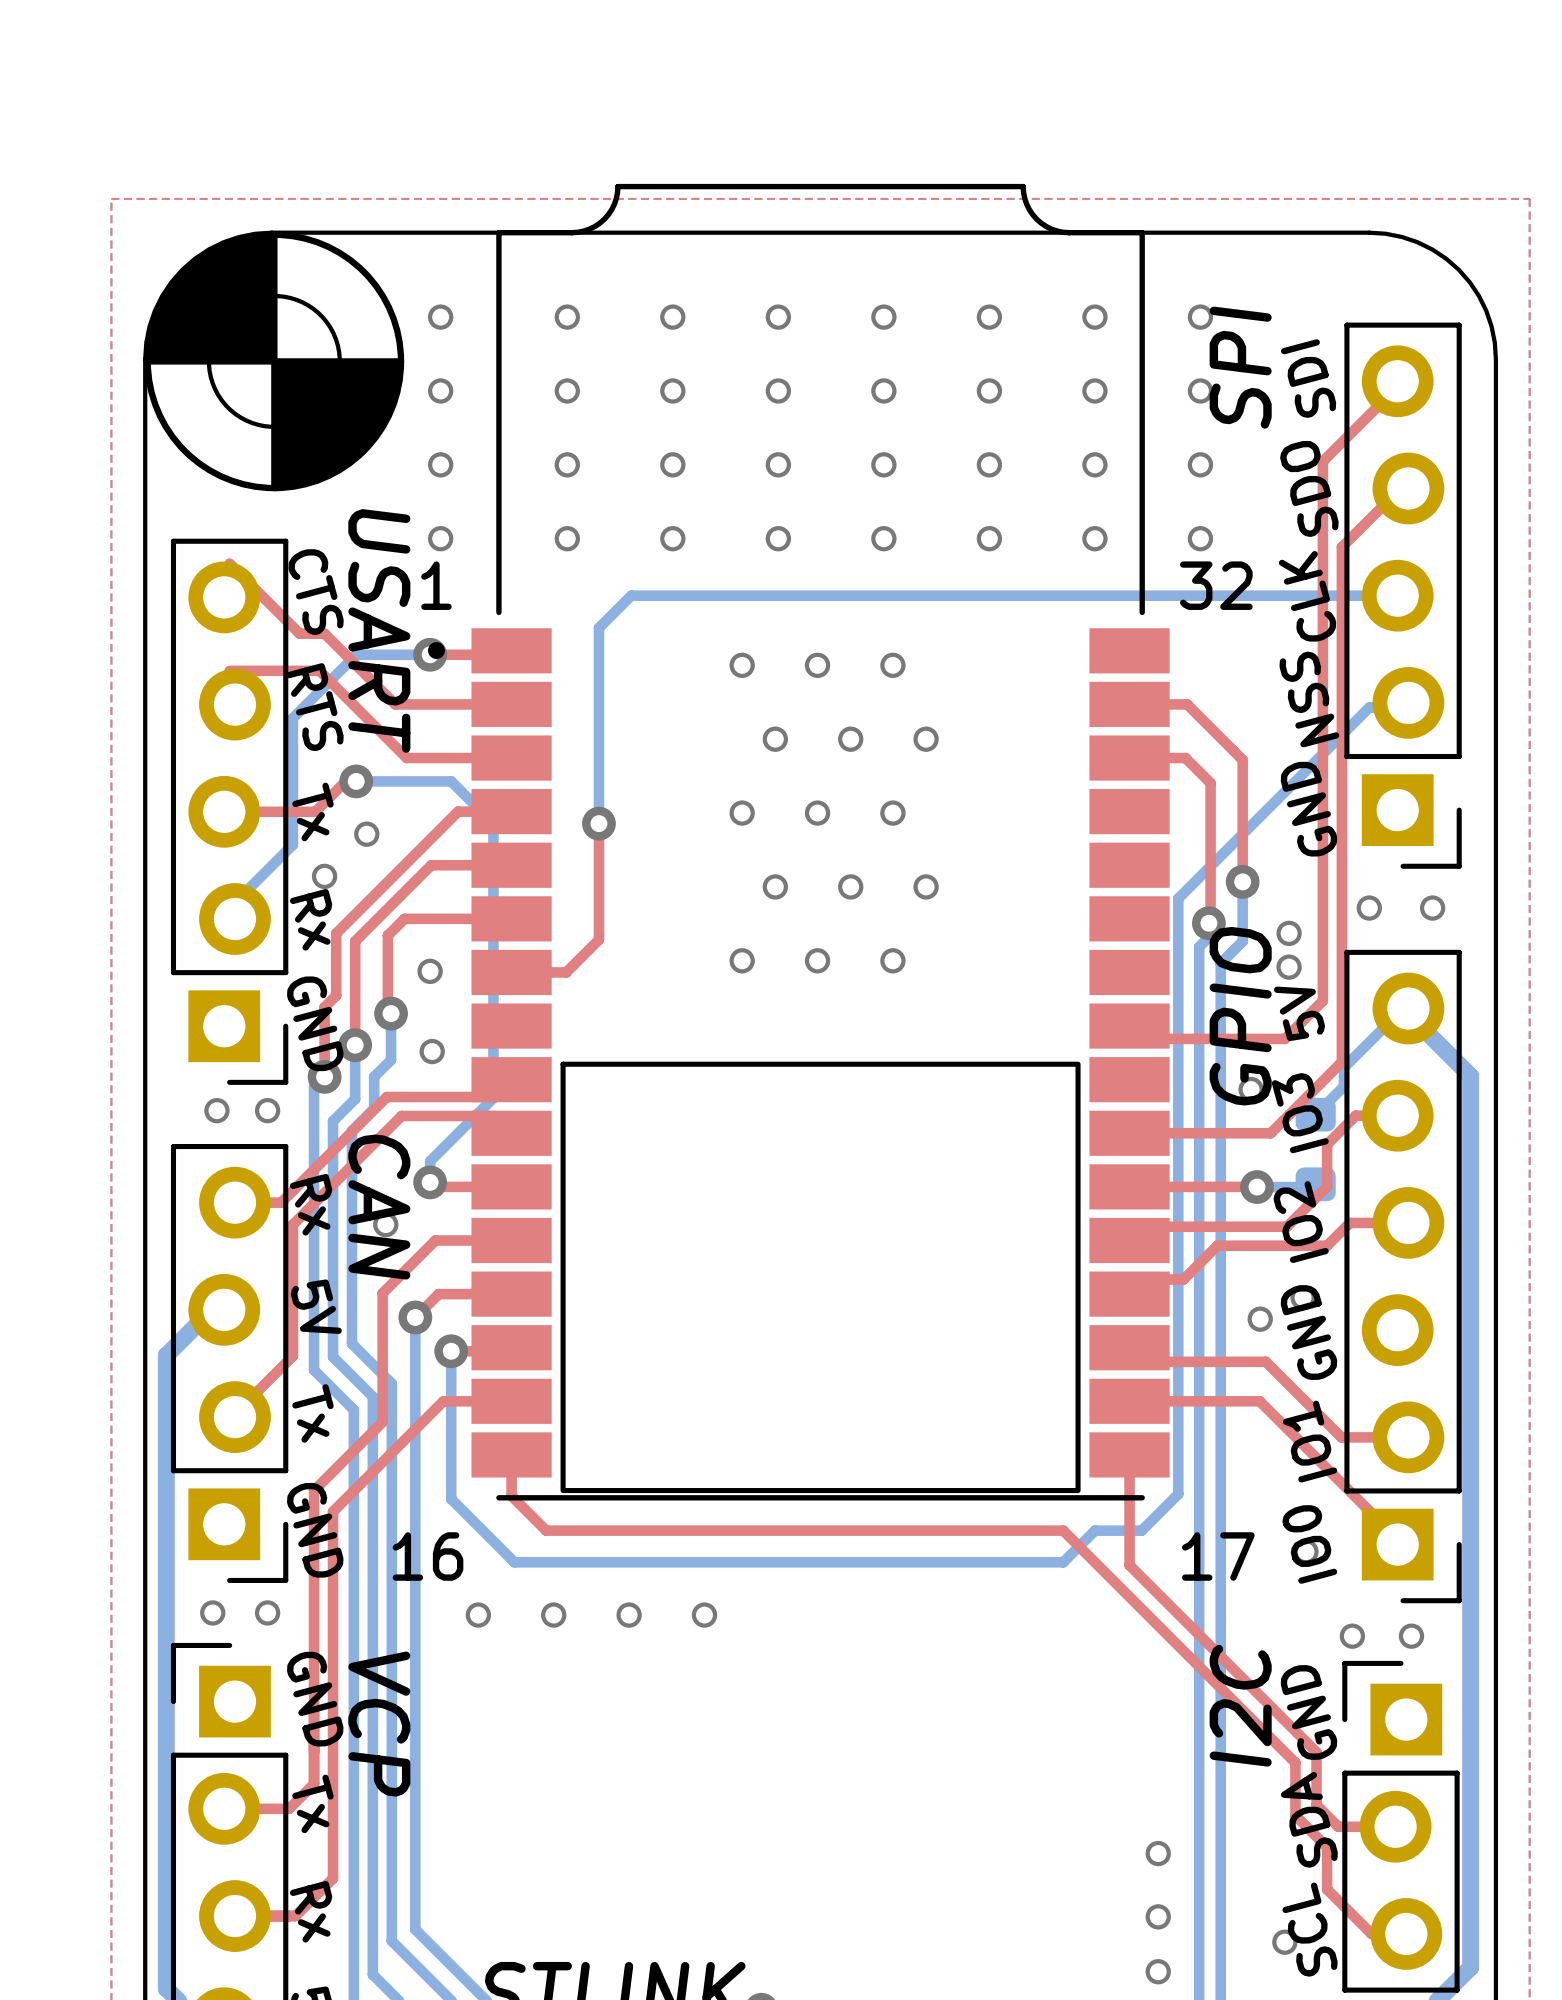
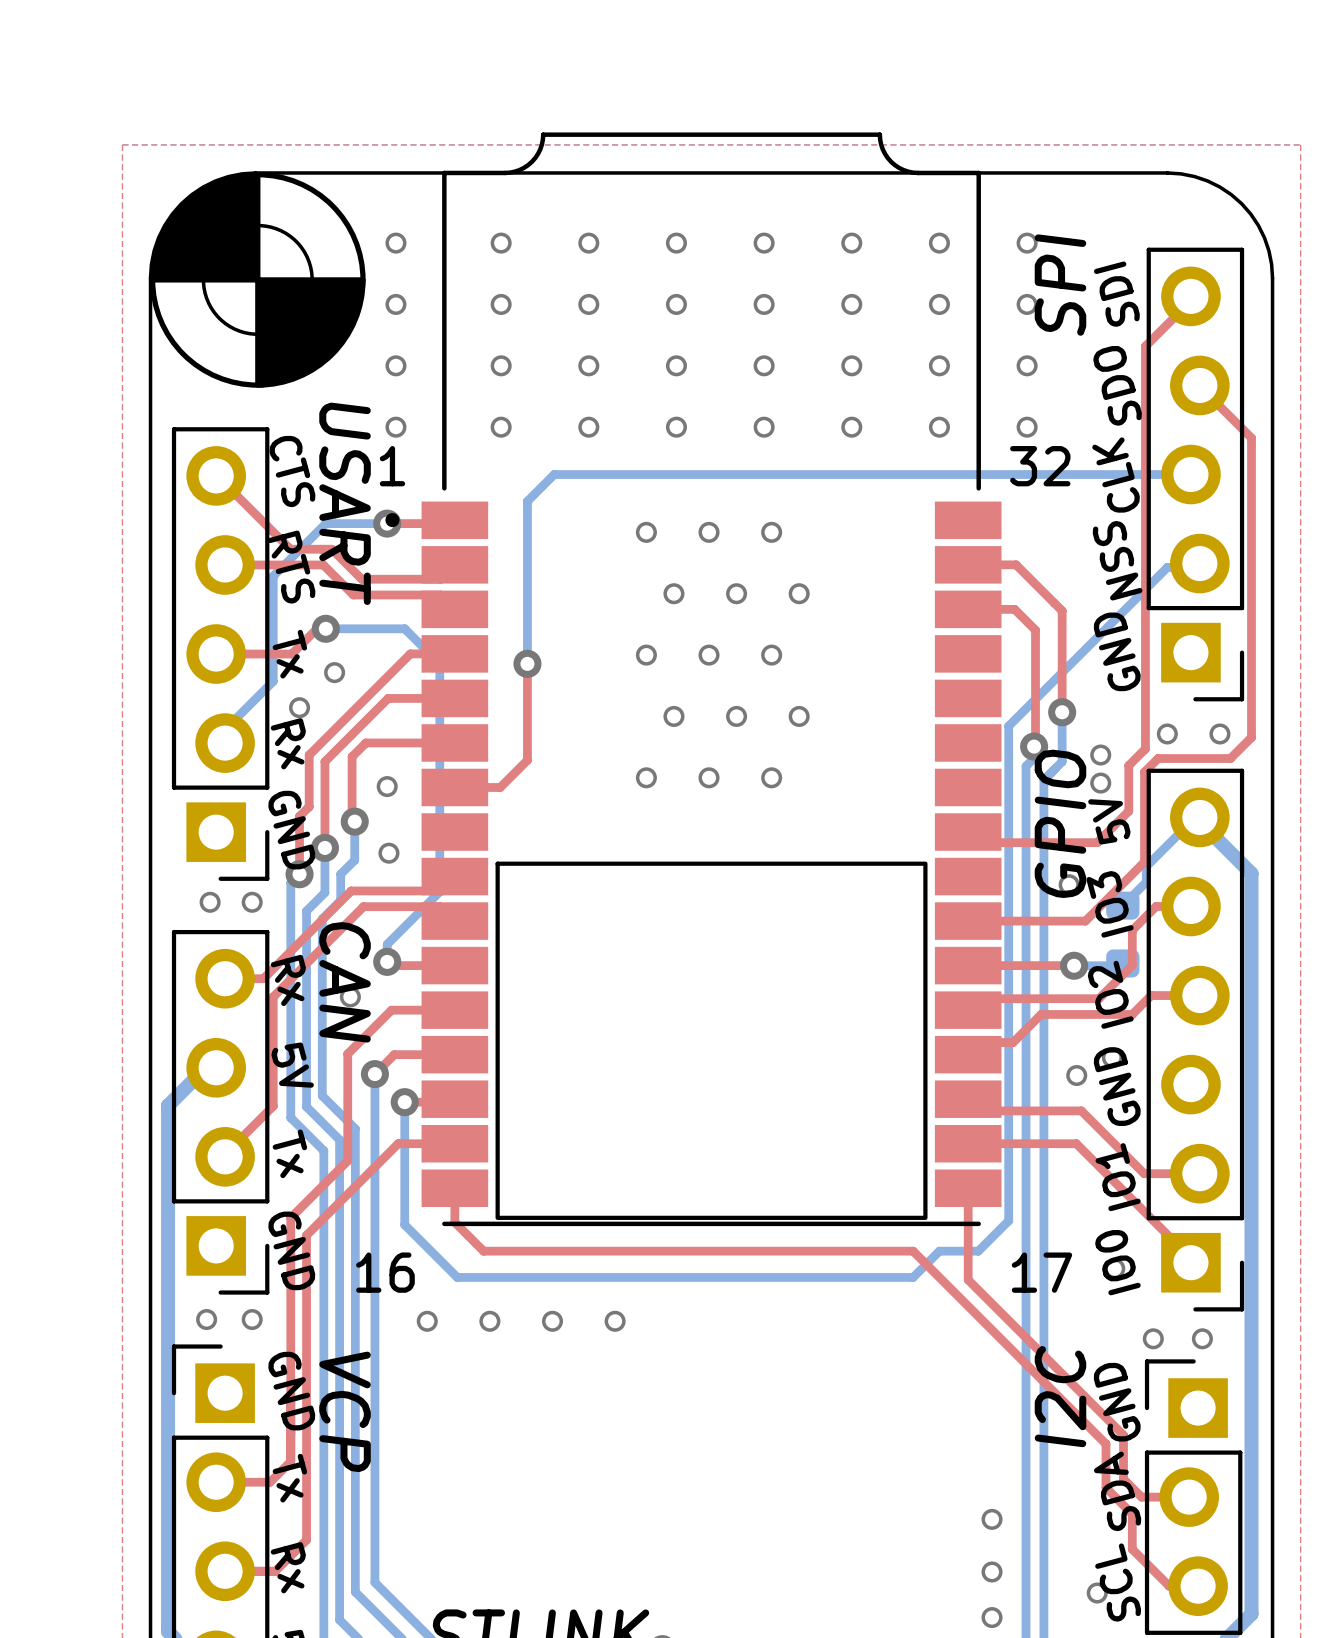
top track: (1342, 441) (1322, 461) (1322, 946) -> (1145, 346) (1145, 748) (1128, 765)
top track: (1400, 488) (1341, 547) (1341, 953) -> (1198, 385) (1251, 438) (1251, 737) (1230, 758) (1158, 758) (1144, 772)
top track: (229, 563) (299, 633) (324, 633) (395, 704) (511, 704) -> (217, 475) (290, 549) (331, 549) (361, 579) (440, 579) (454, 564)
top track: (229, 670) (319, 670) (353, 704) -> (224, 564) (323, 564)
top track: (389, 740) (406, 758) (511, 758) -> (353, 594) (440, 594) (454, 609)

